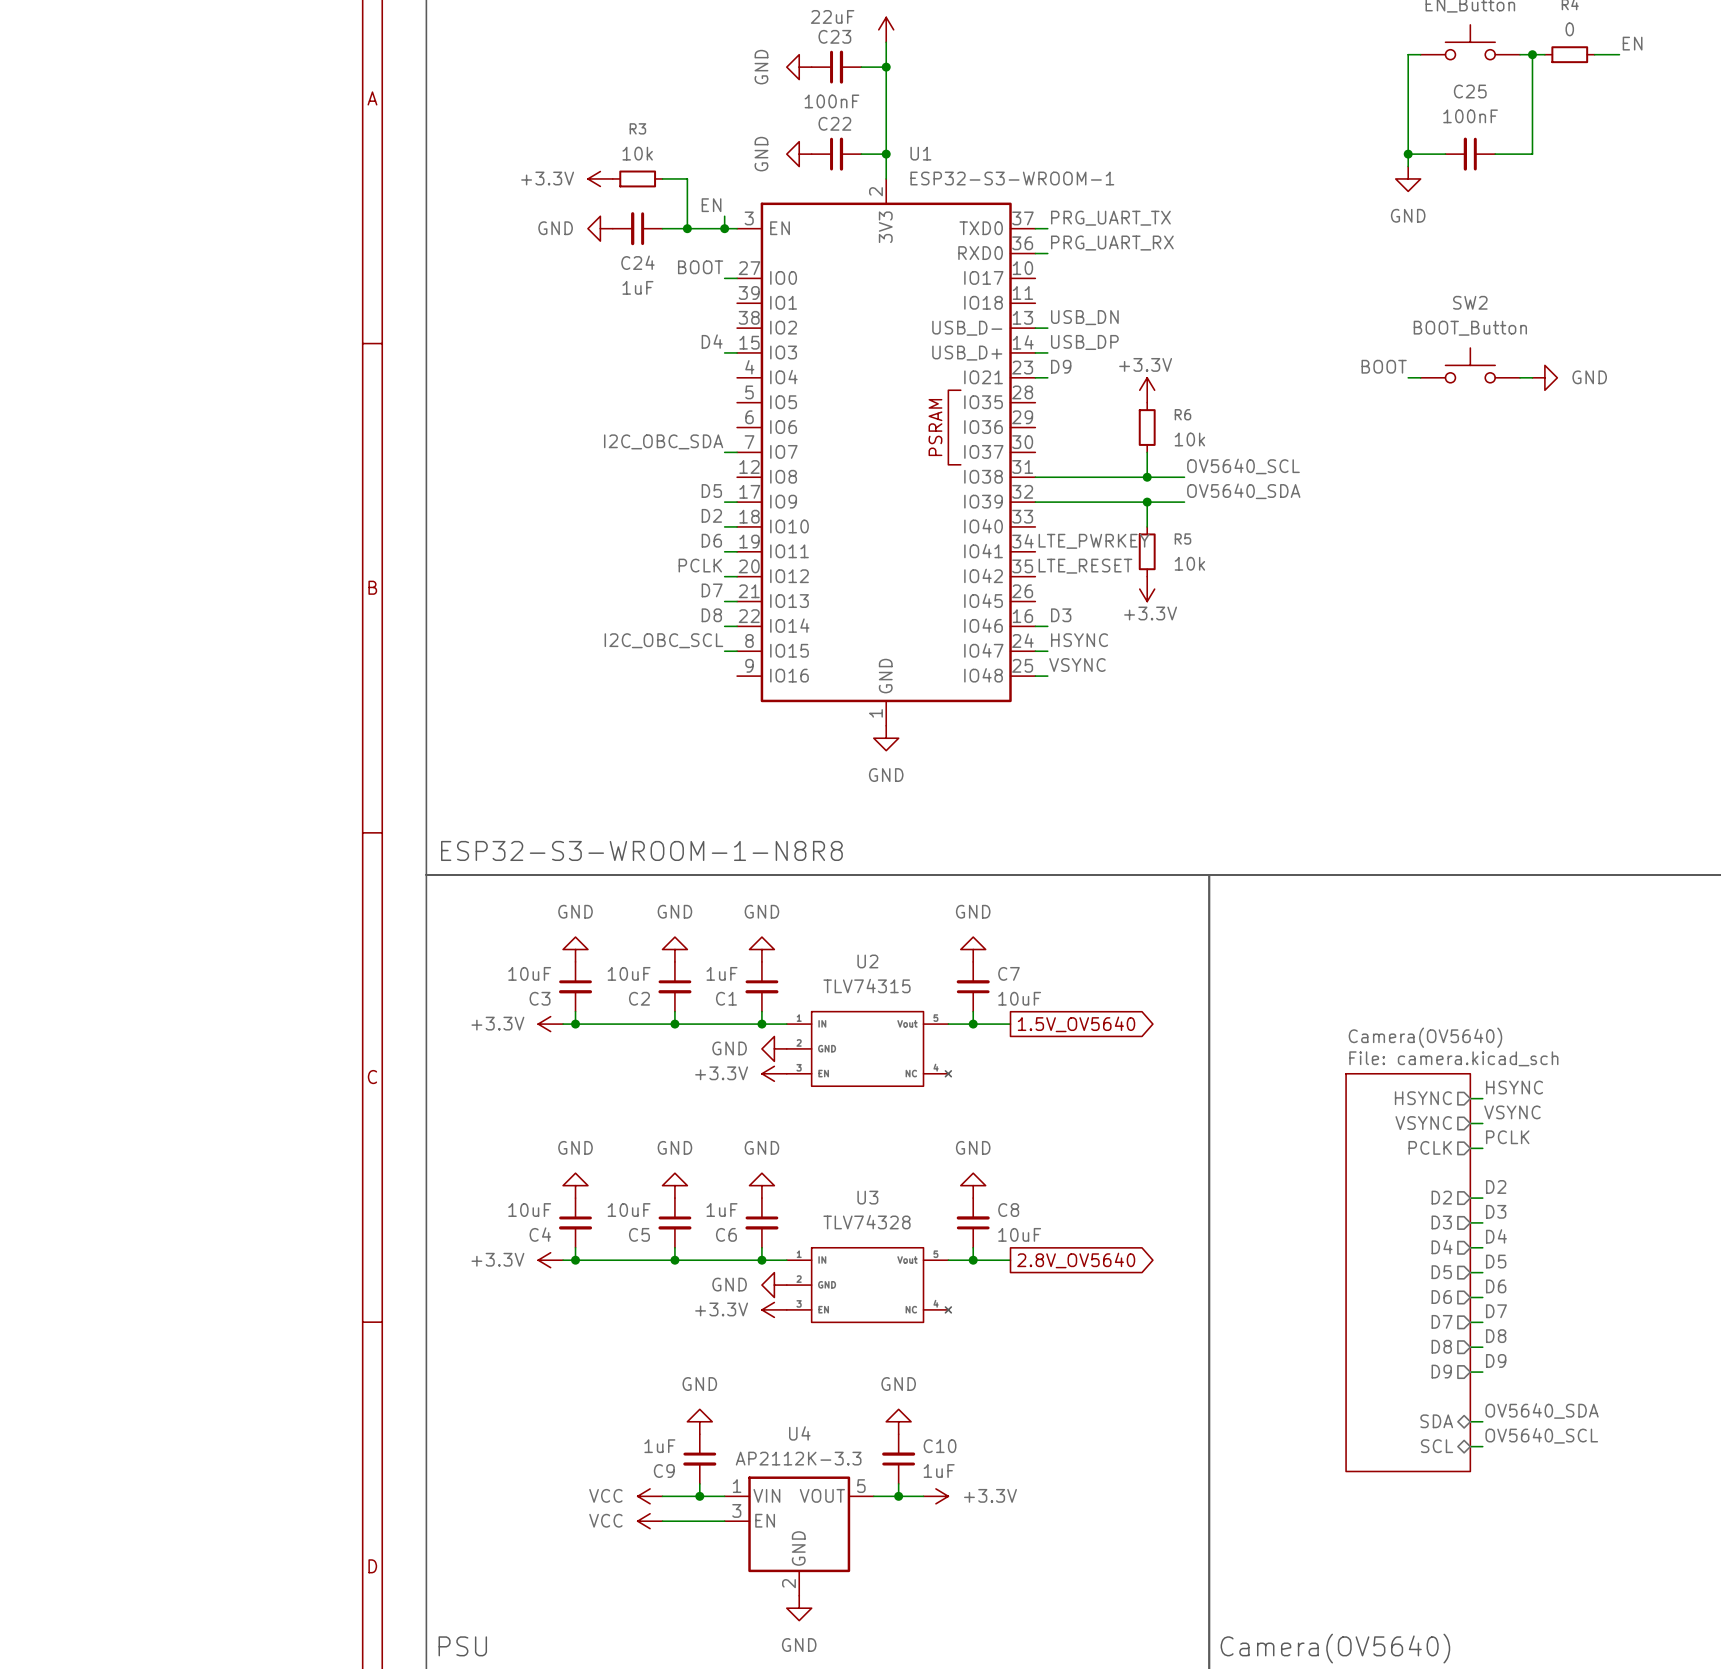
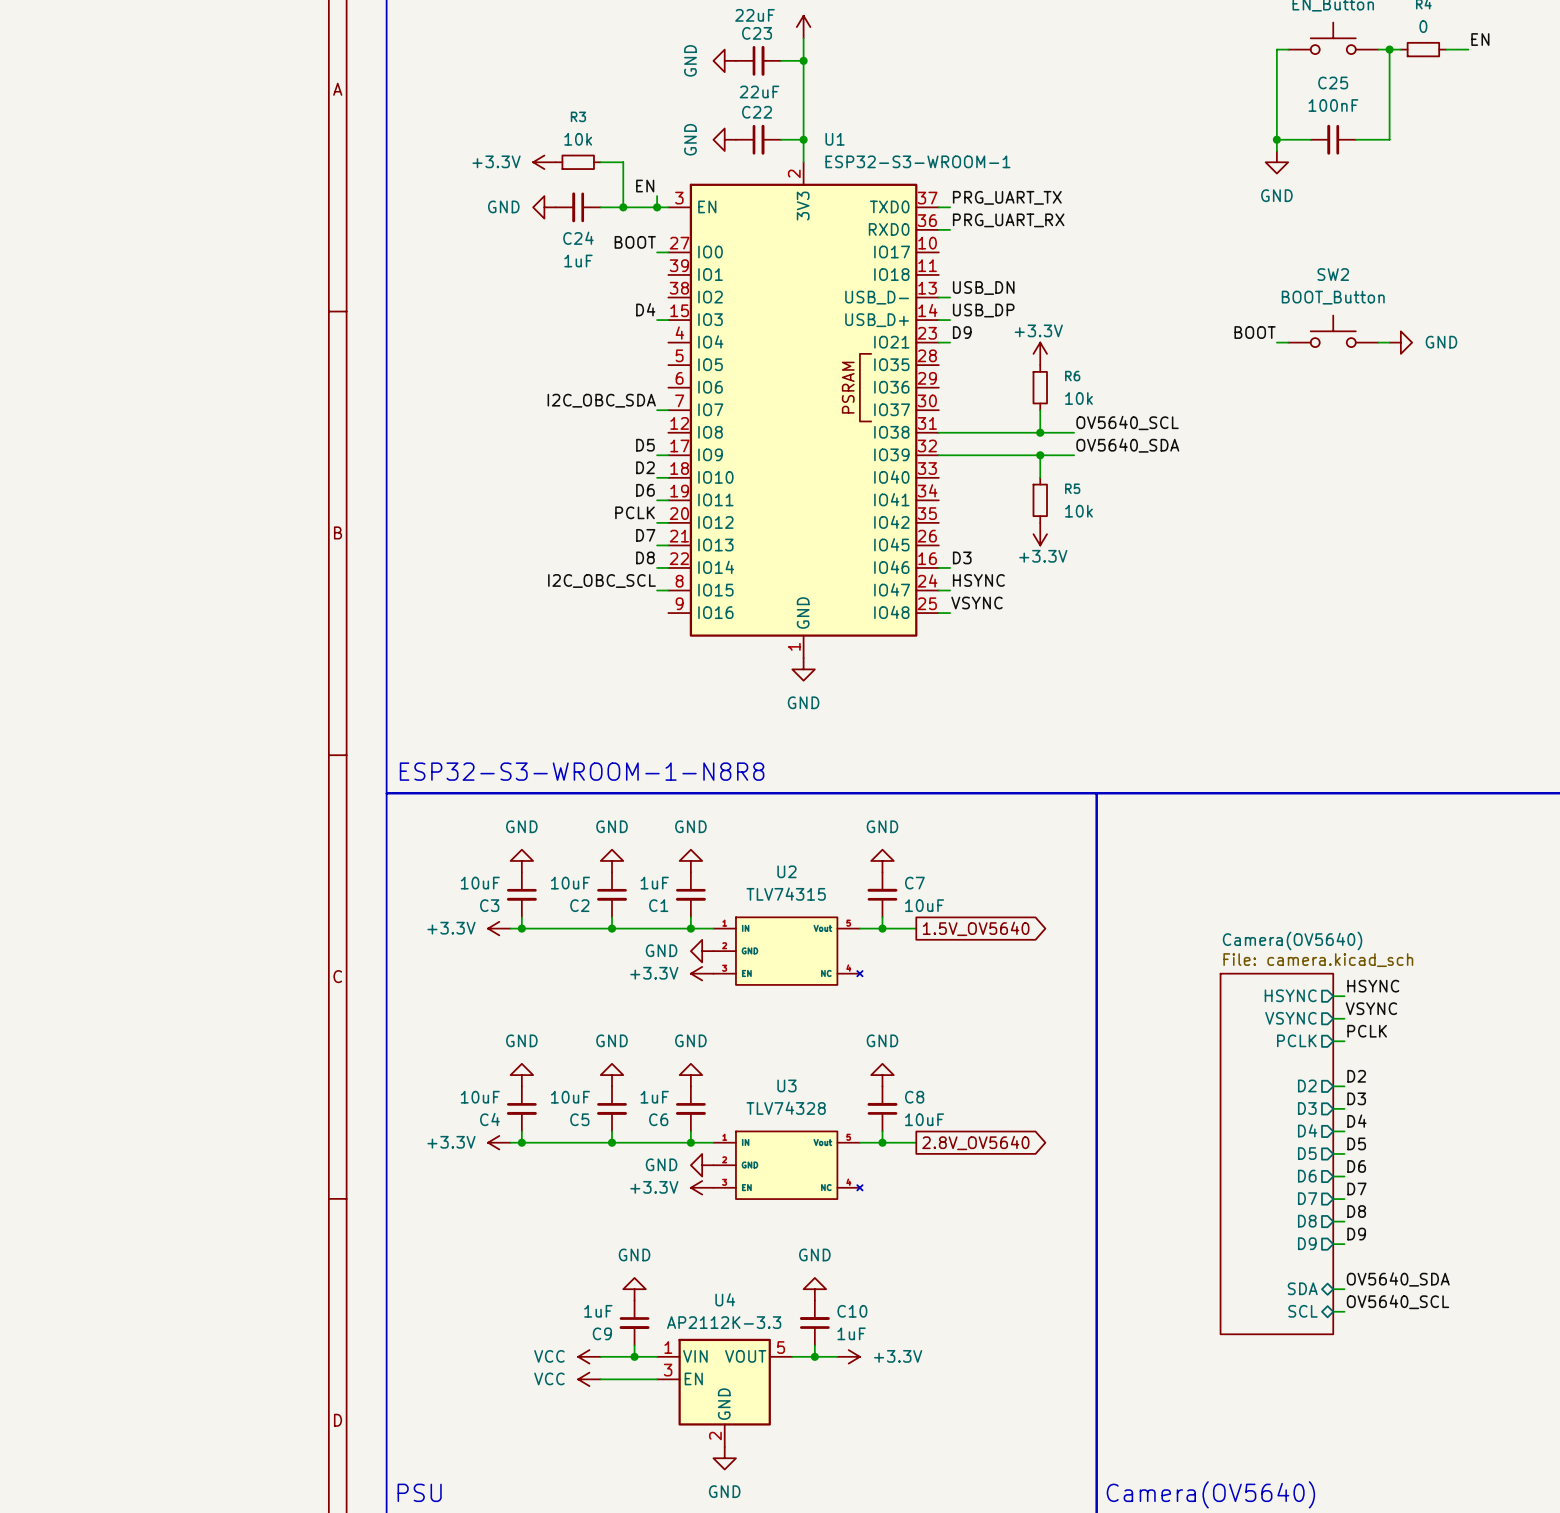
C22 value: 100nF (831, 101) -> 22uF (759, 91)
label: LTE_PWRKEY (1094, 541) -> none
label: LTE_RESET (1085, 566) -> none

